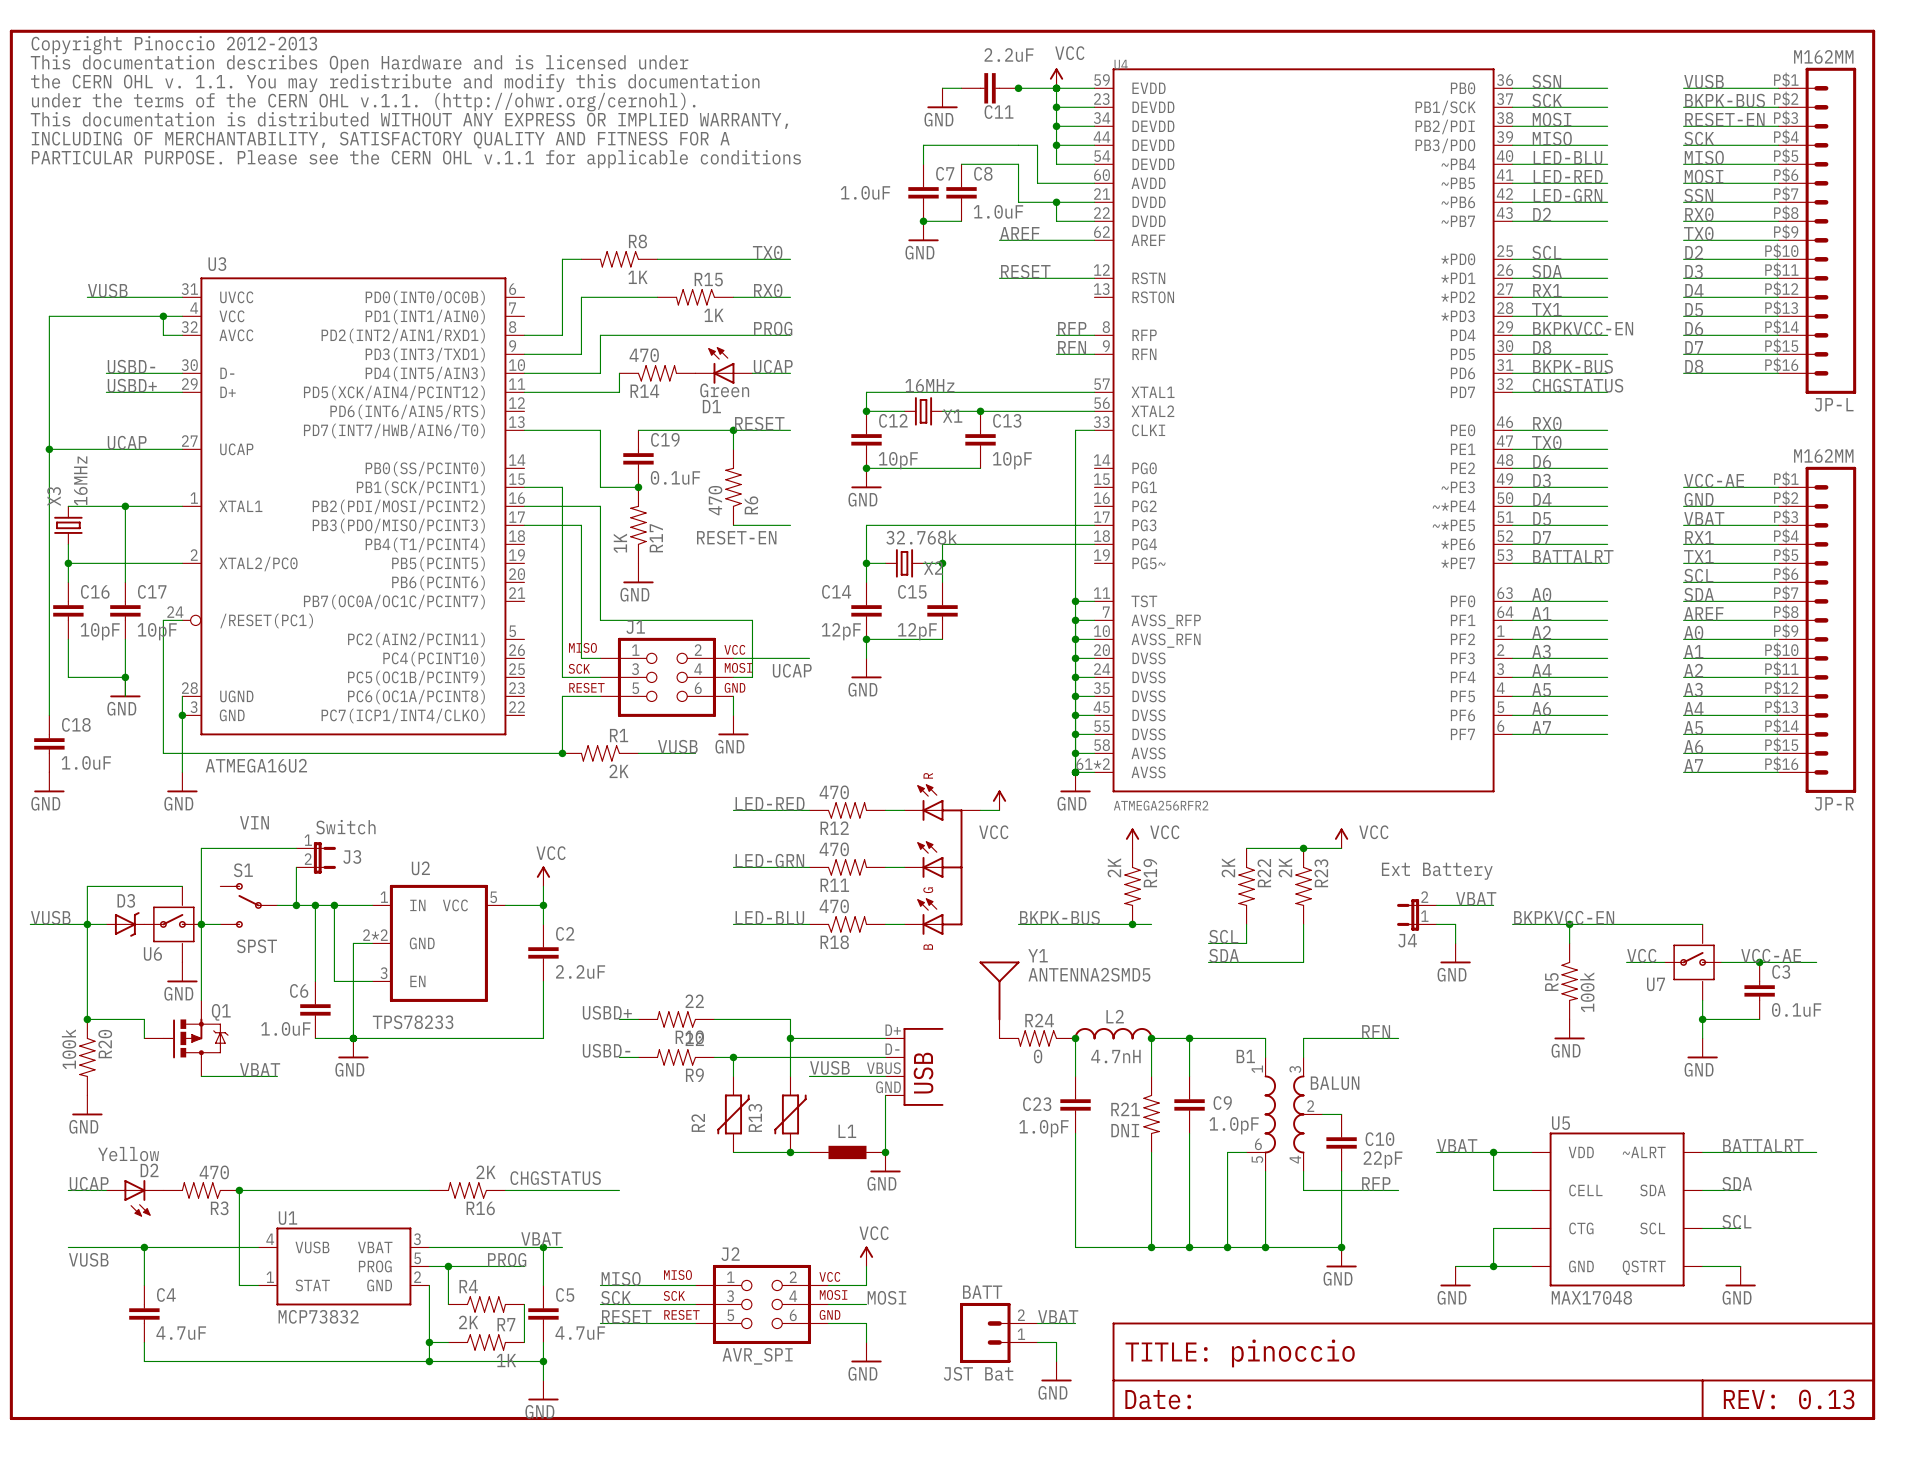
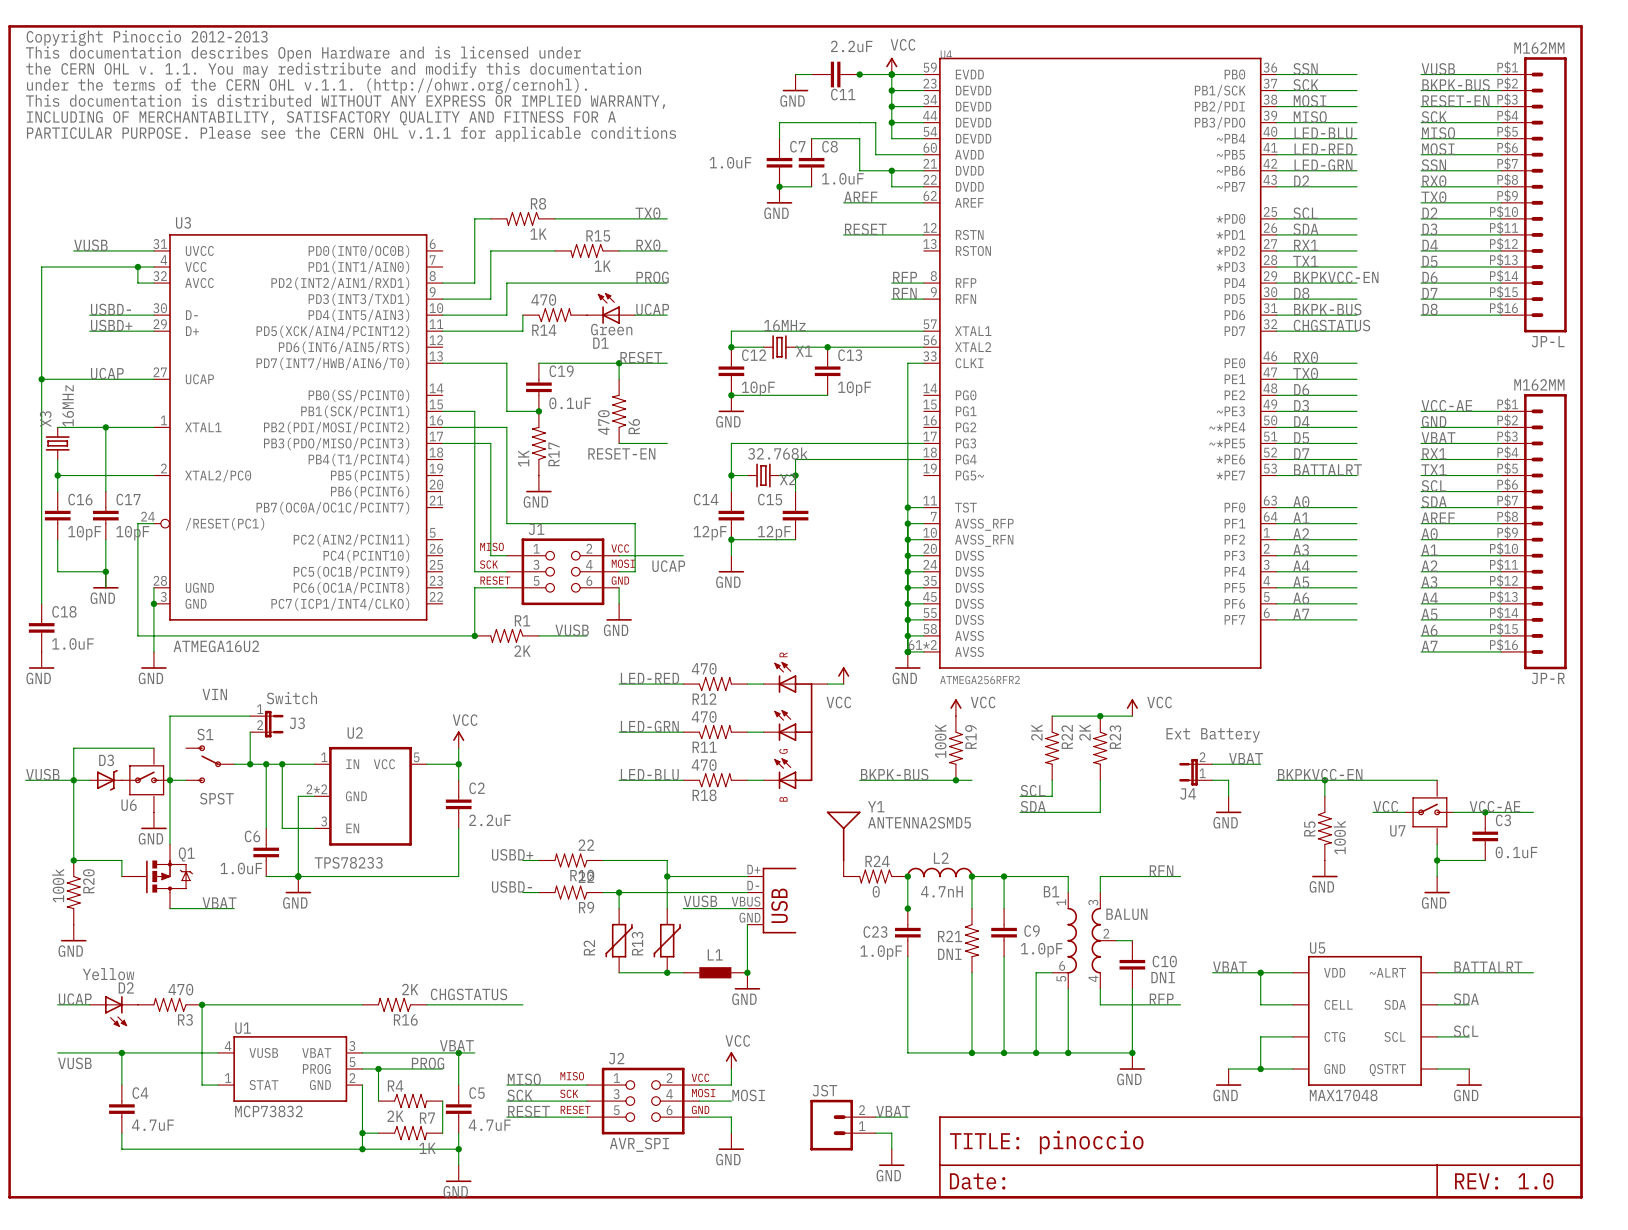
R19 value: 2K (1114, 867) -> 100K (940, 741)
junction: none -> (907, 908)
C10 value: 22pF (1383, 1159) -> DNI (1163, 977)
BATT name: BATT (982, 1292) -> JST (824, 1090)
BATT value: JST Bat (978, 1373) -> none
text: 0.13 (1826, 1399) -> 1.0 (1535, 1181)

